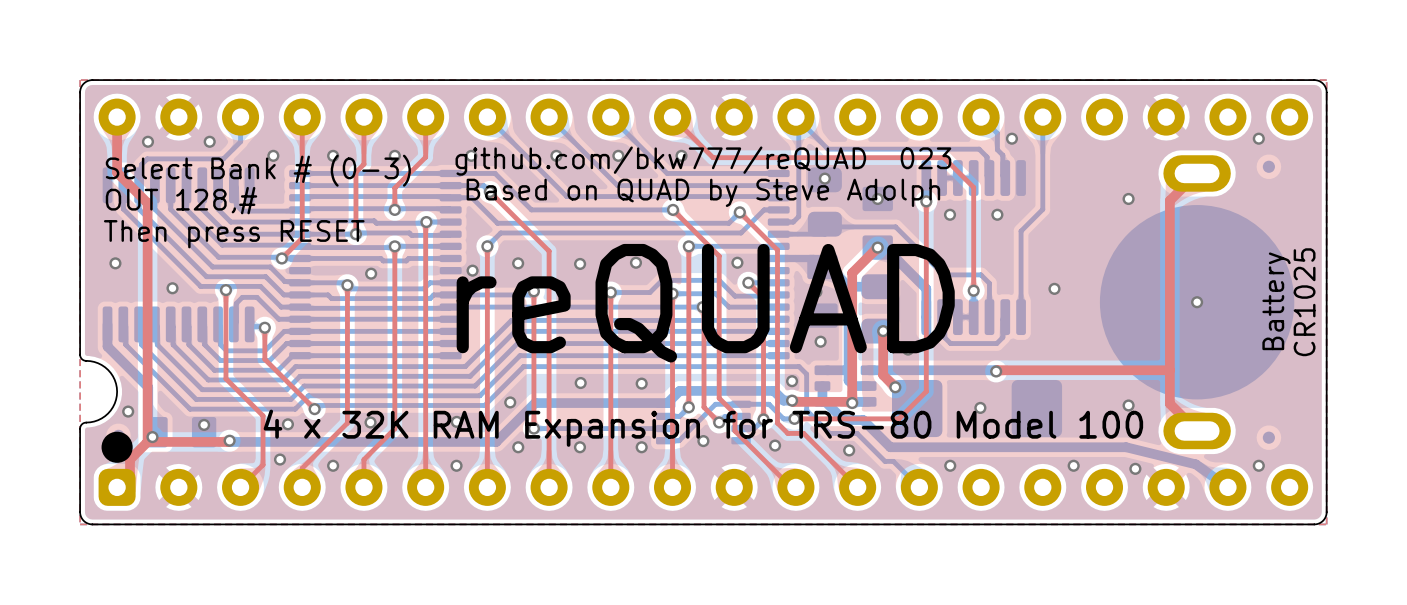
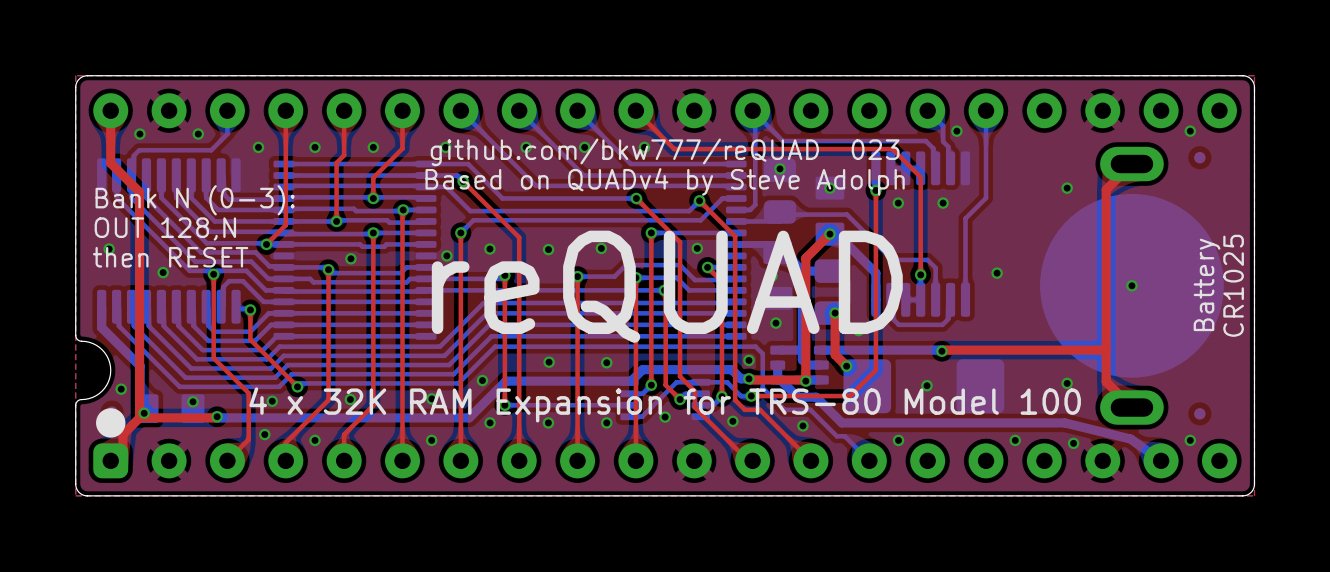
text: Select Bank # (0-3) (258, 170) -> none
text: Based on QUAD by Steve Adolph (703, 192) -> Based on QUADv4 by Steve Adolph (665, 181)
text: OUT 128,# (181, 200) -> none
text: none -> Bank N (0-3): (195, 200)
text: Then press RESET (234, 234) -> none
text: none -> OUT 128,N (165, 228)
text: none -> then RESET (170, 257)

